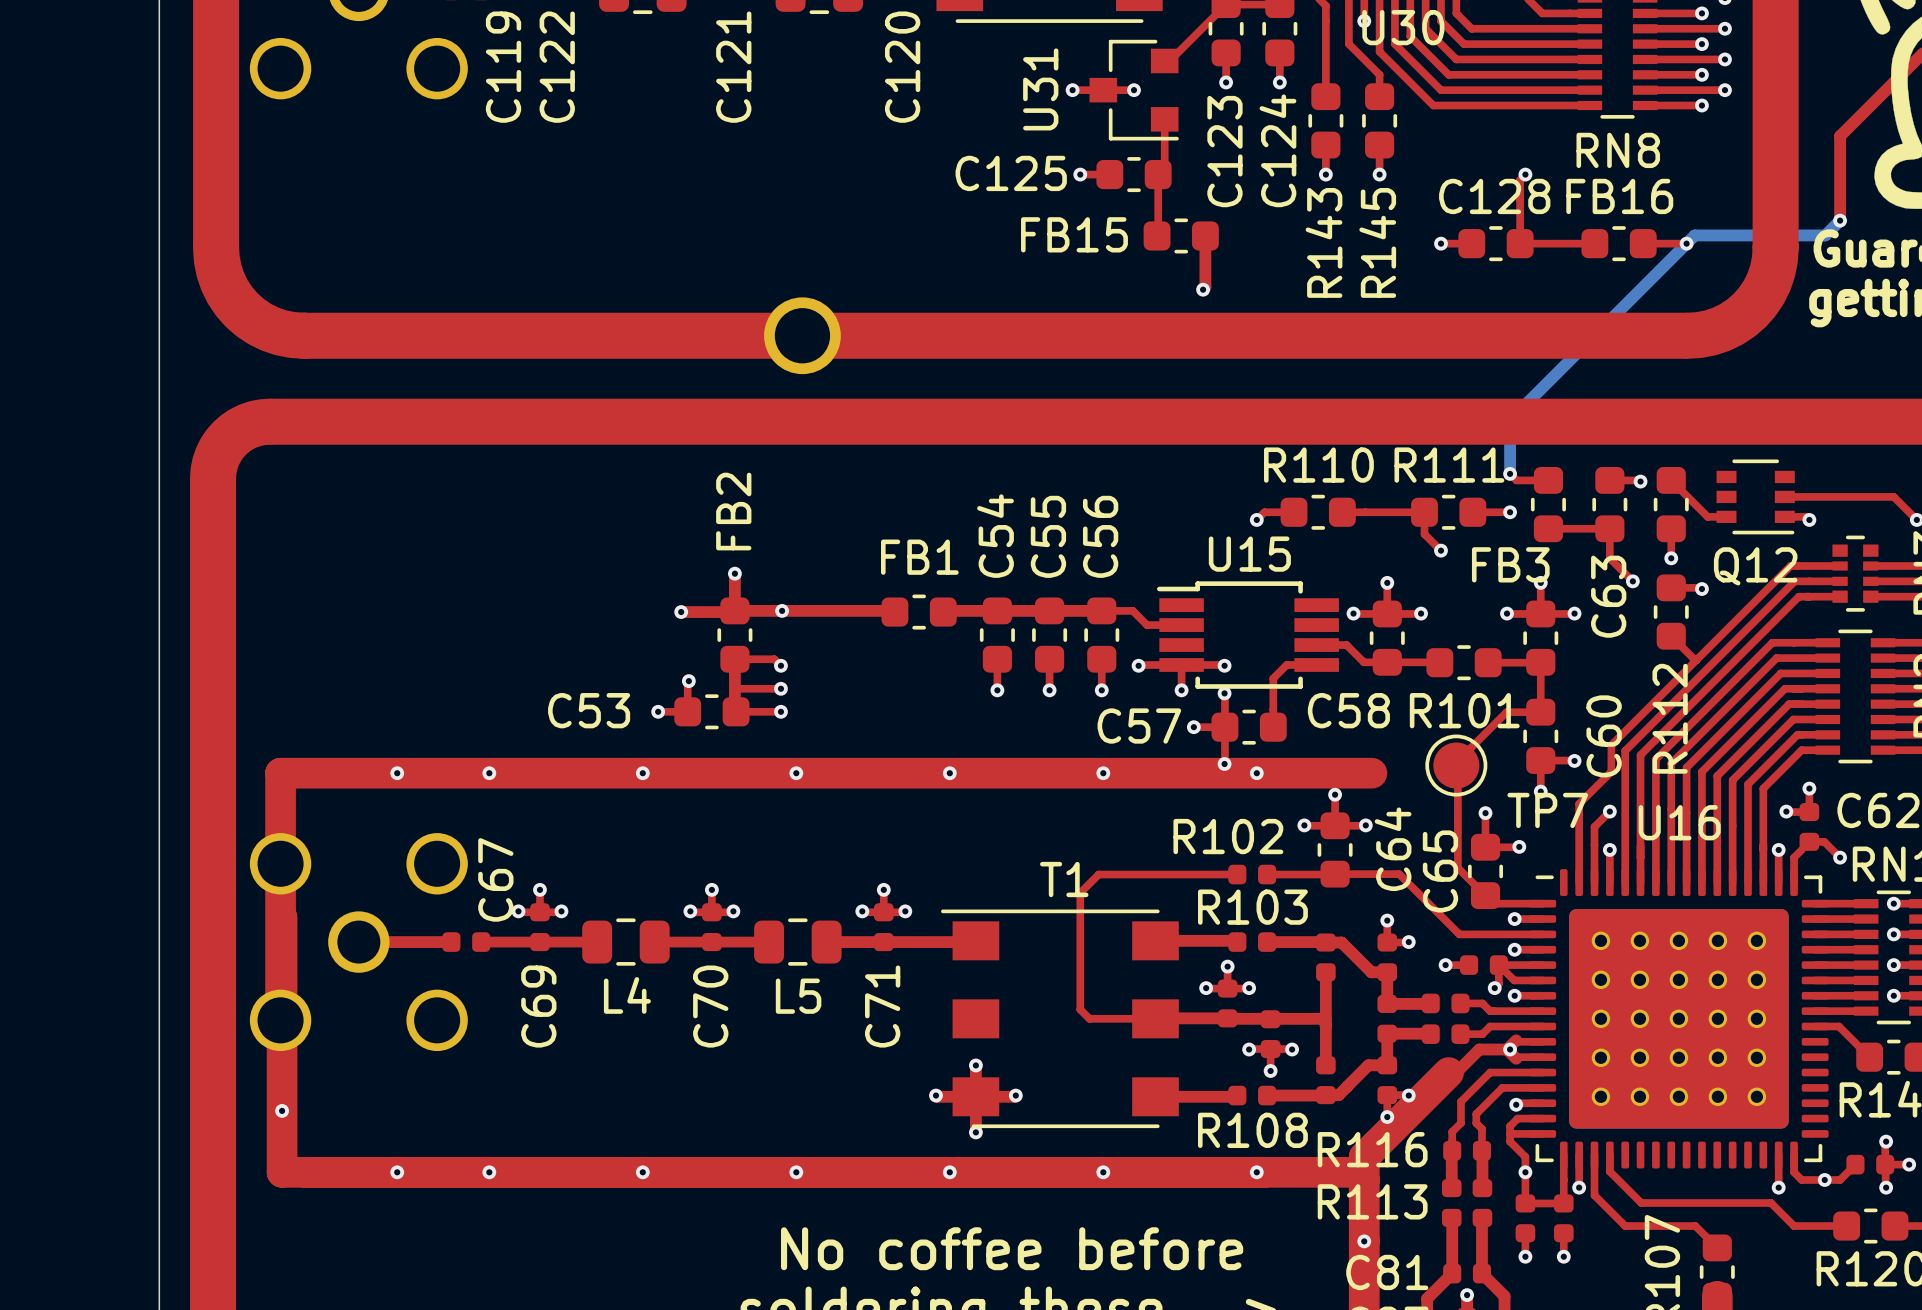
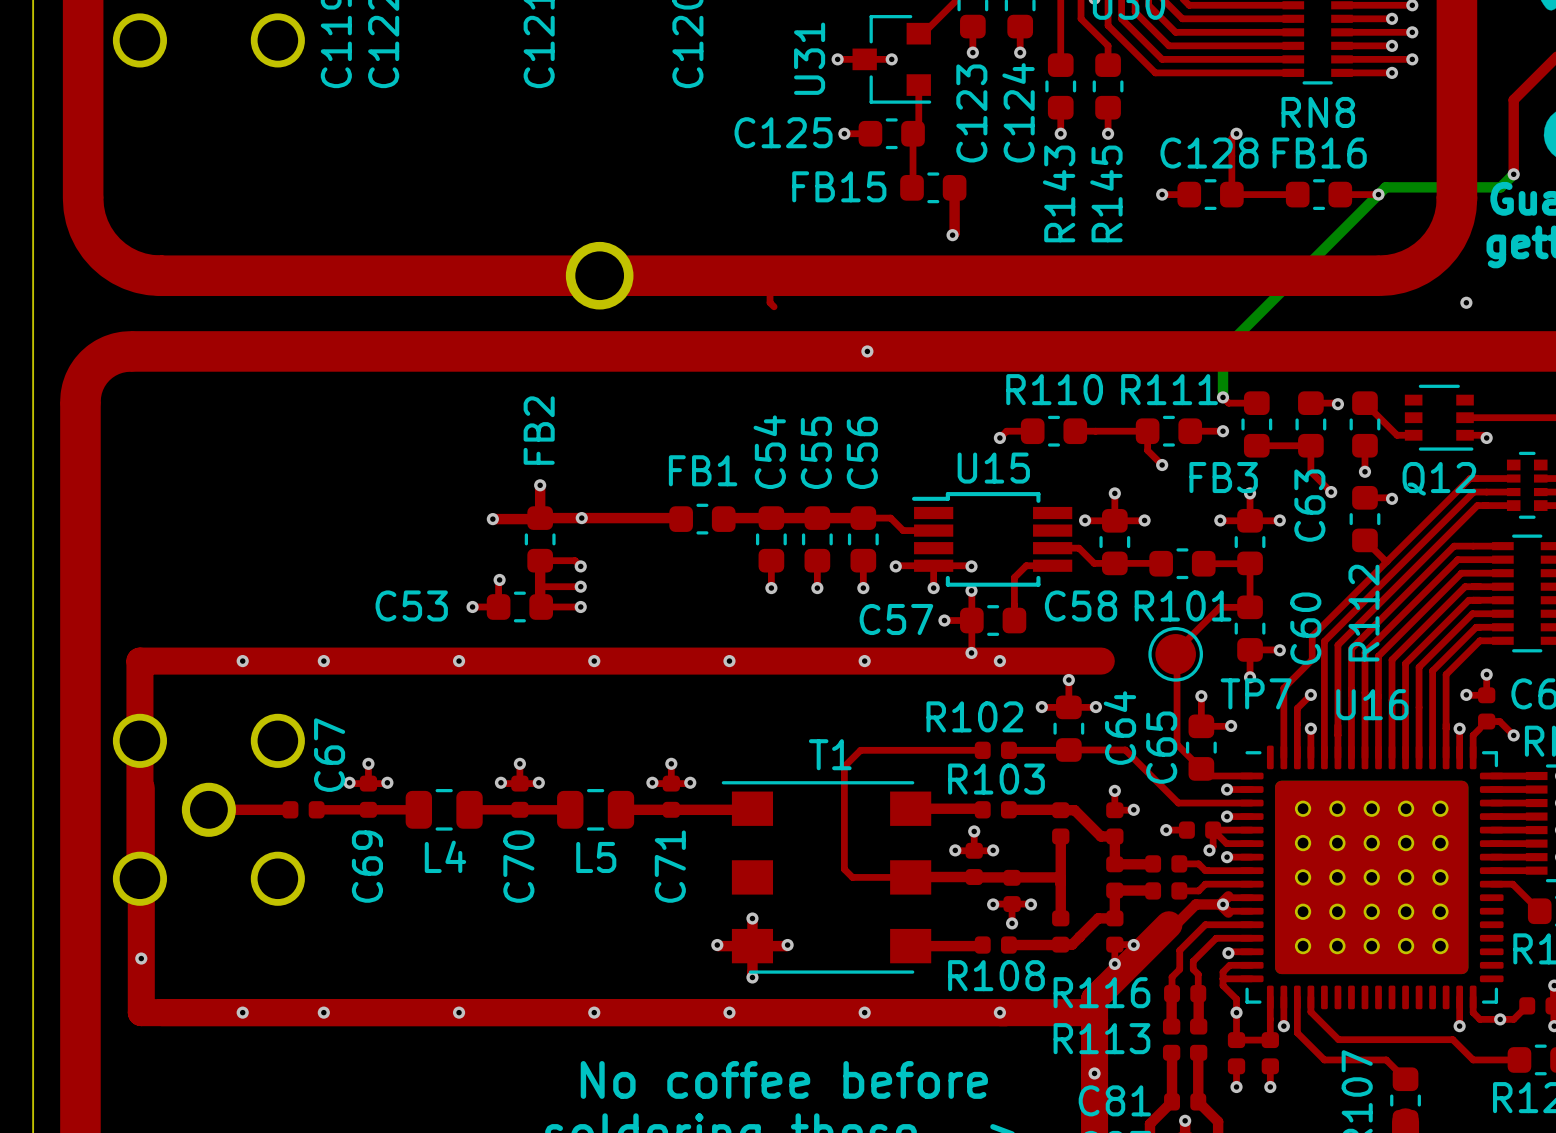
top track: none -> (770, 275) (770, 302) (774, 306)
via: none -> (1466, 302)
via: none -> (867, 351)

